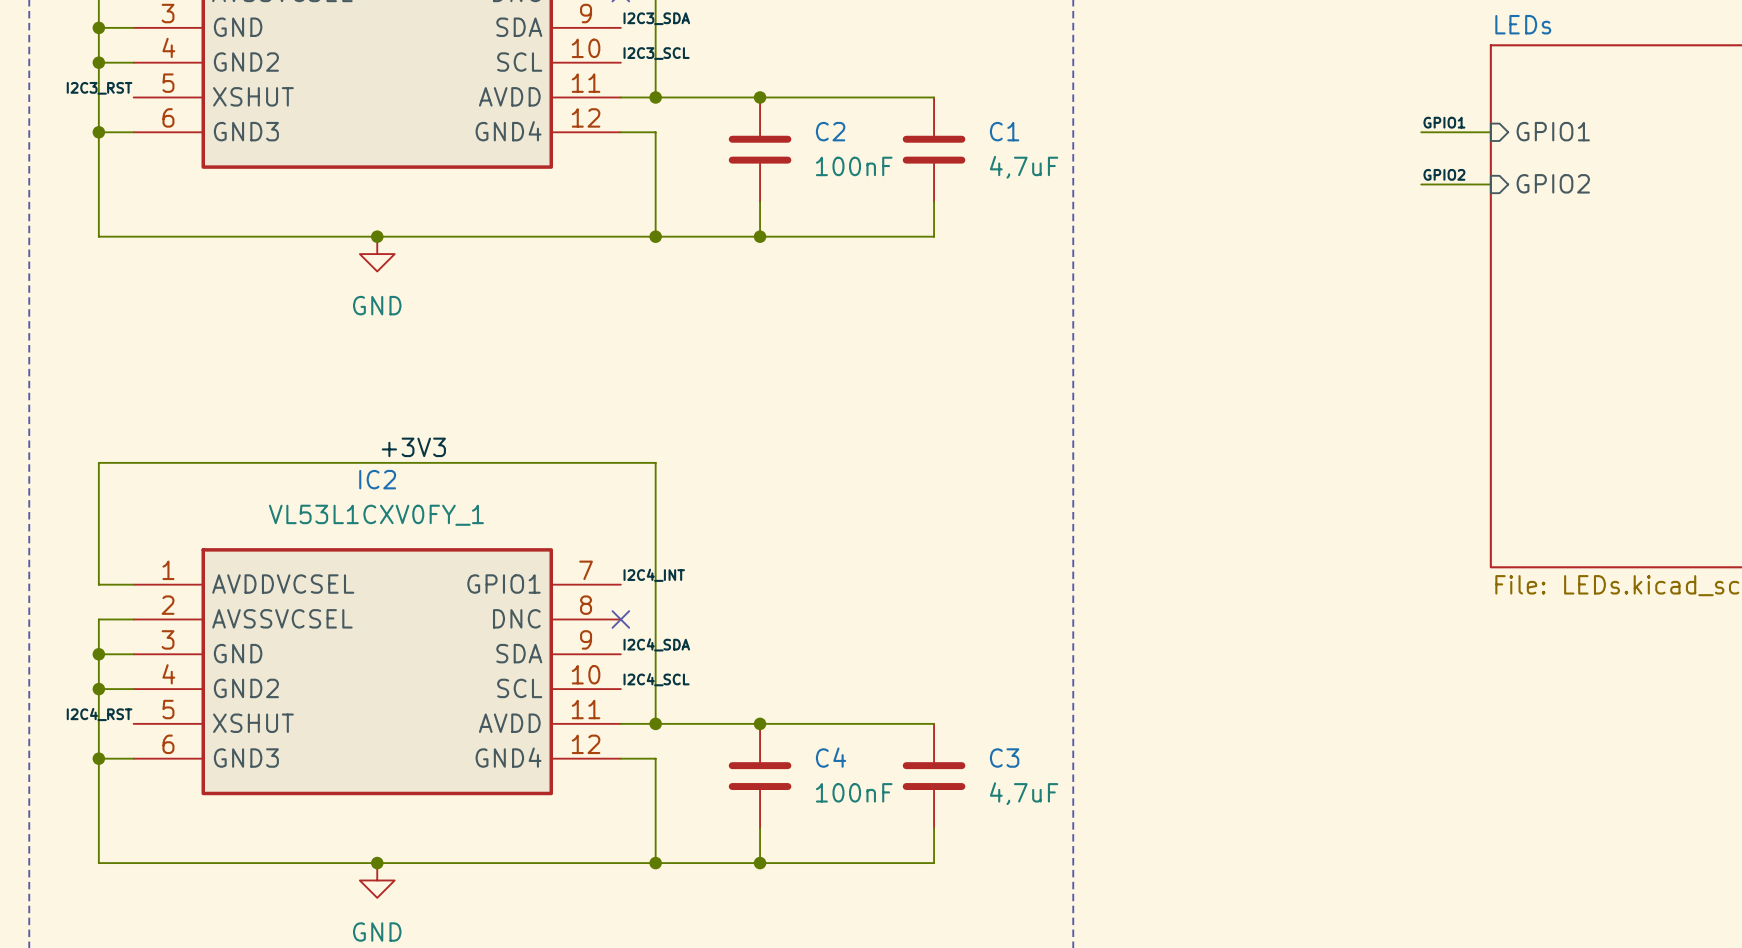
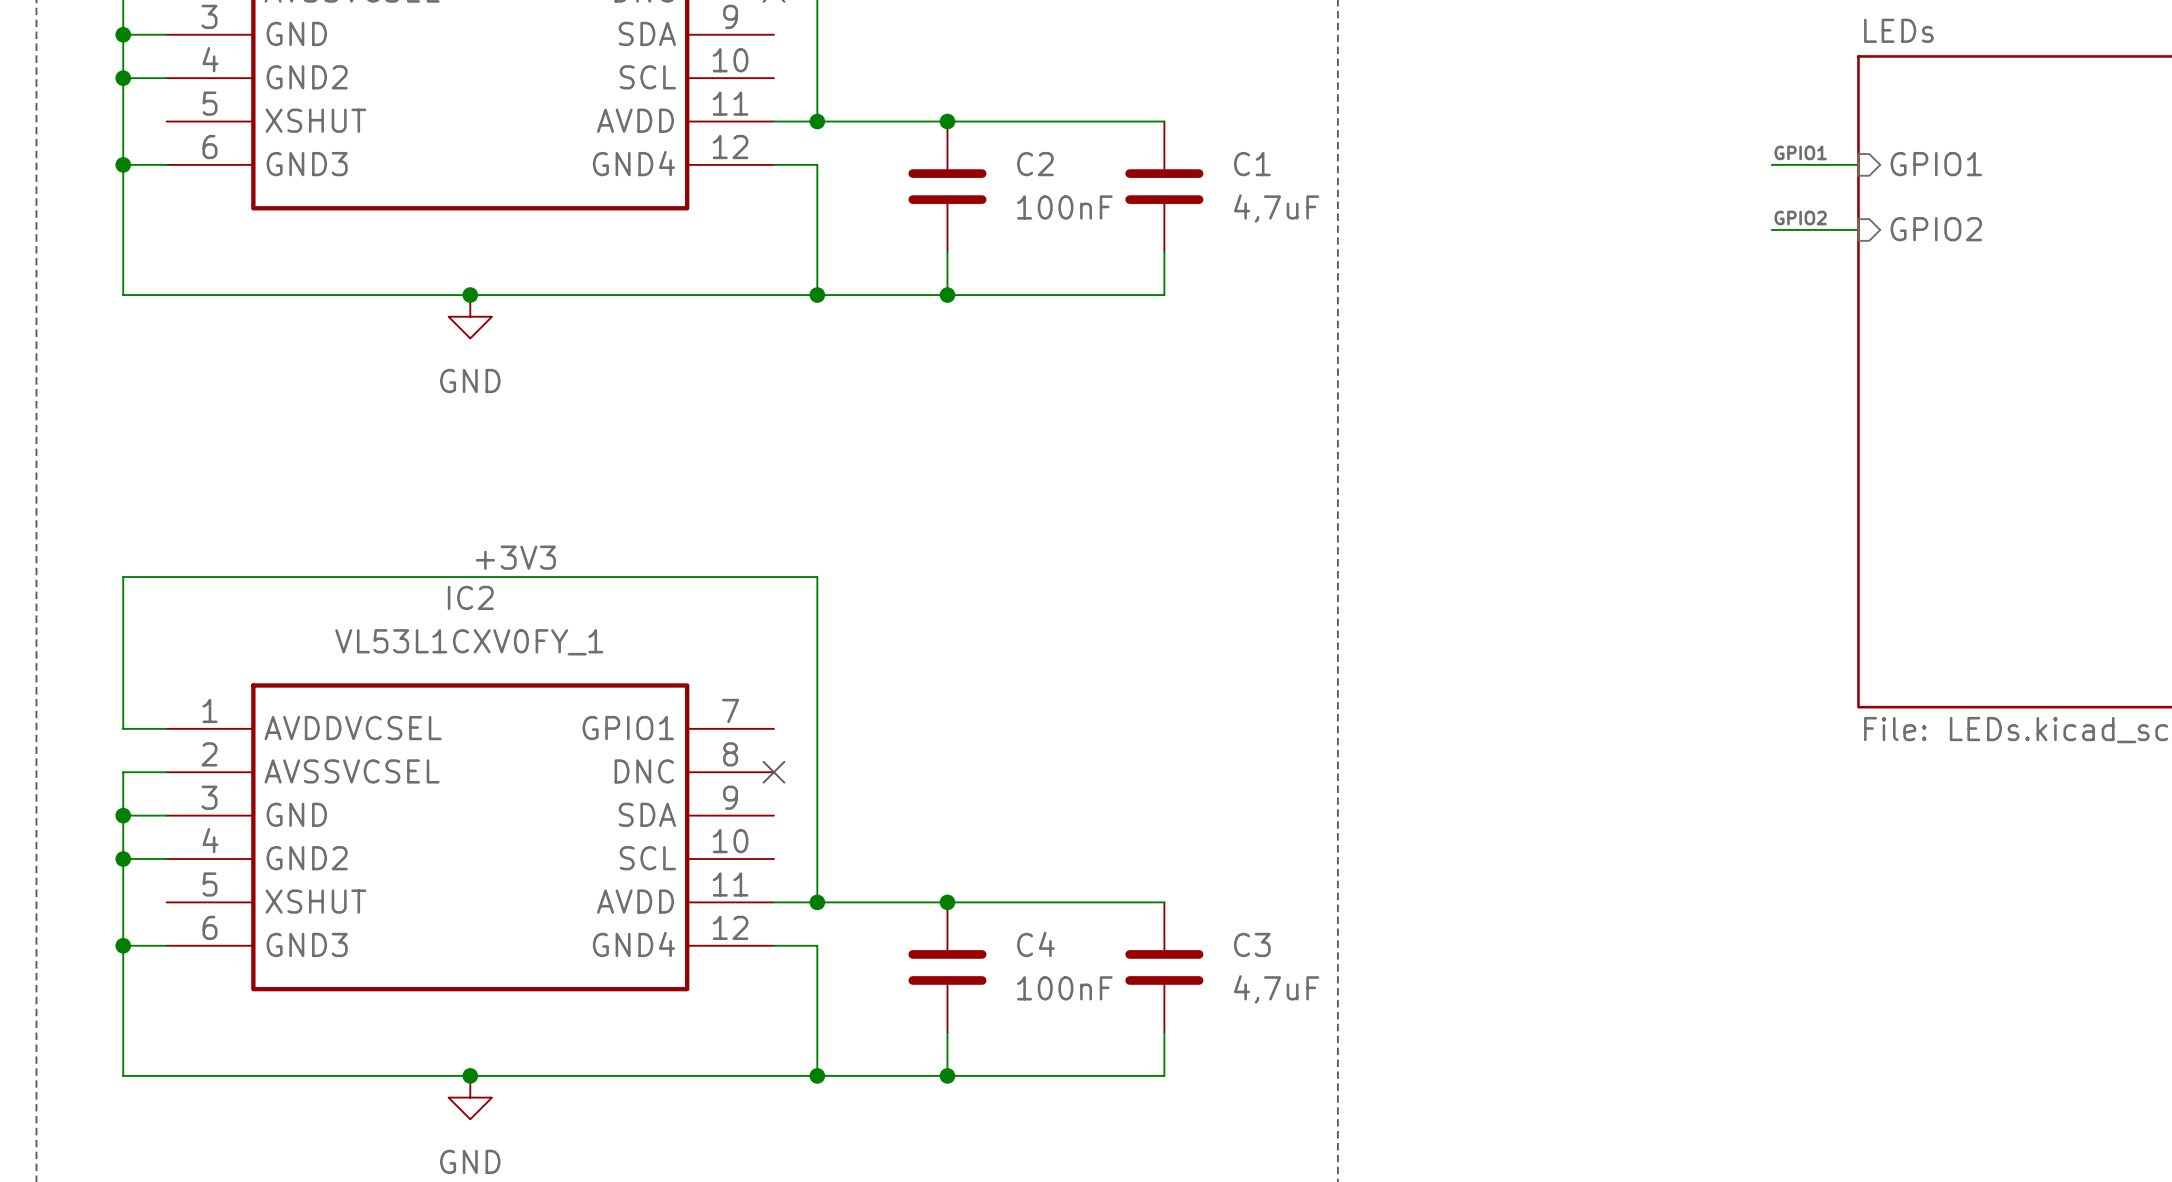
label: I2C3_SDA (656, 18) -> none
label: I2C3_SCL (656, 53) -> none
label: I2C3_RST (99, 88) -> none
label: I2C4_INT (654, 575) -> none
label: I2C4_SDA (656, 644) -> none
label: I2C4_SCL (656, 679) -> none
label: I2C4_RST (99, 714) -> none

